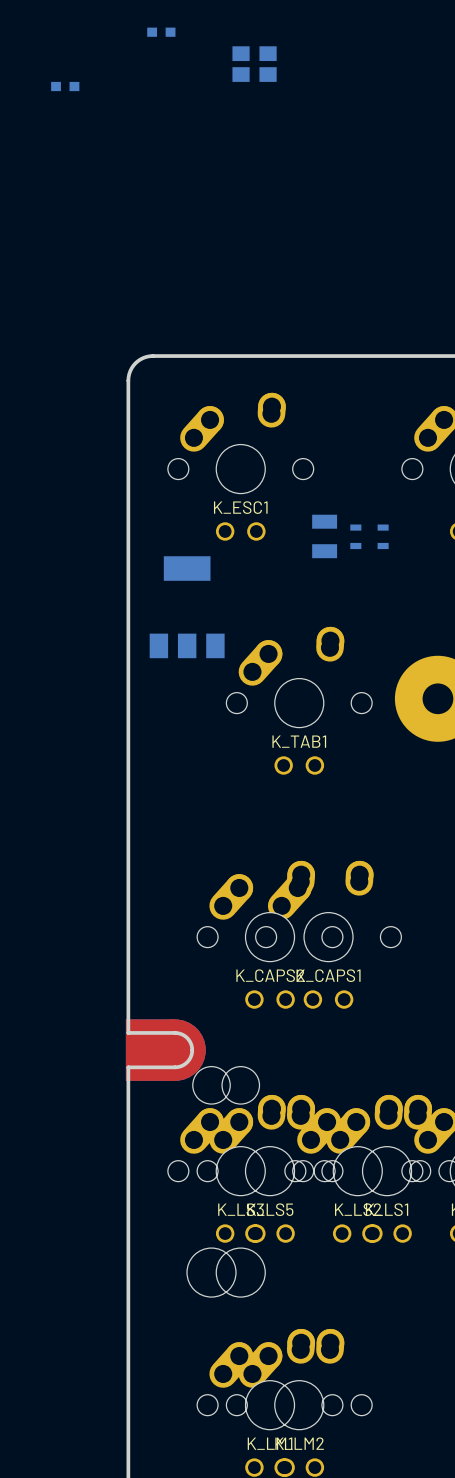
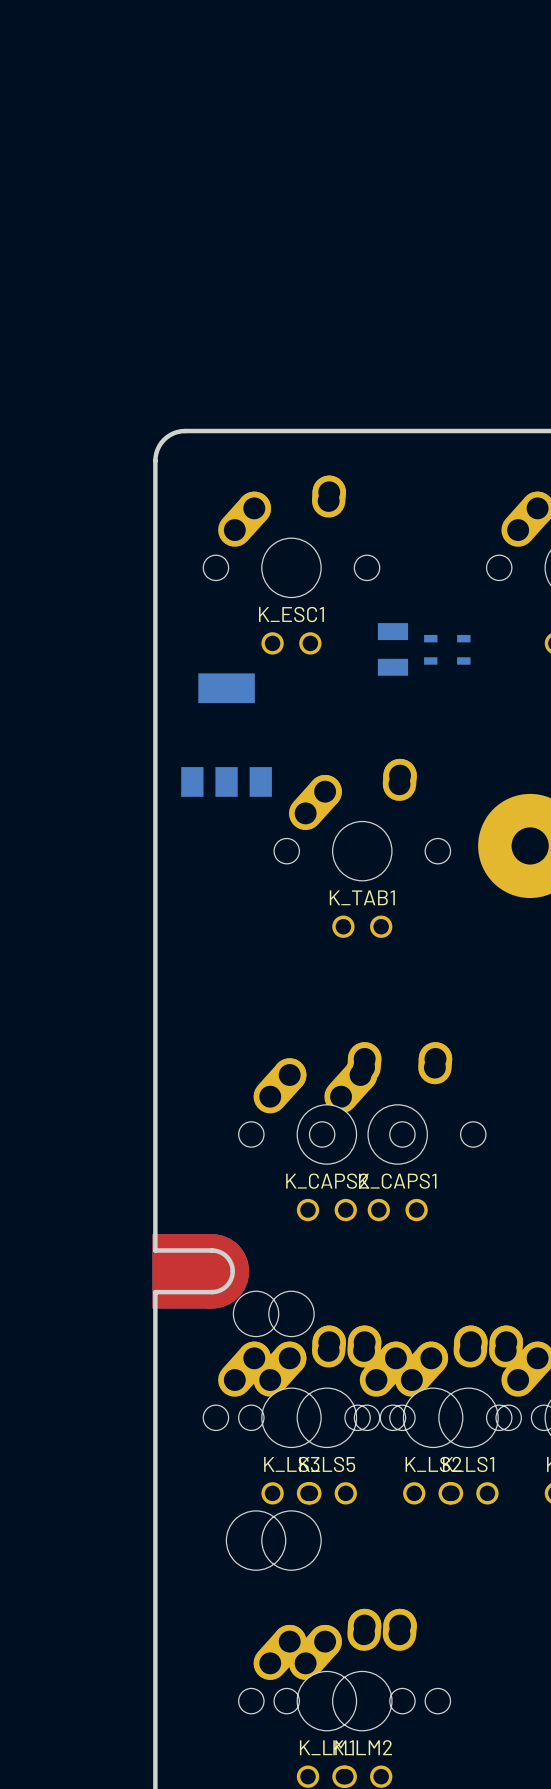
part: (161, 32) -> none
part: (254, 64) -> none
part: (65, 86) -> none

